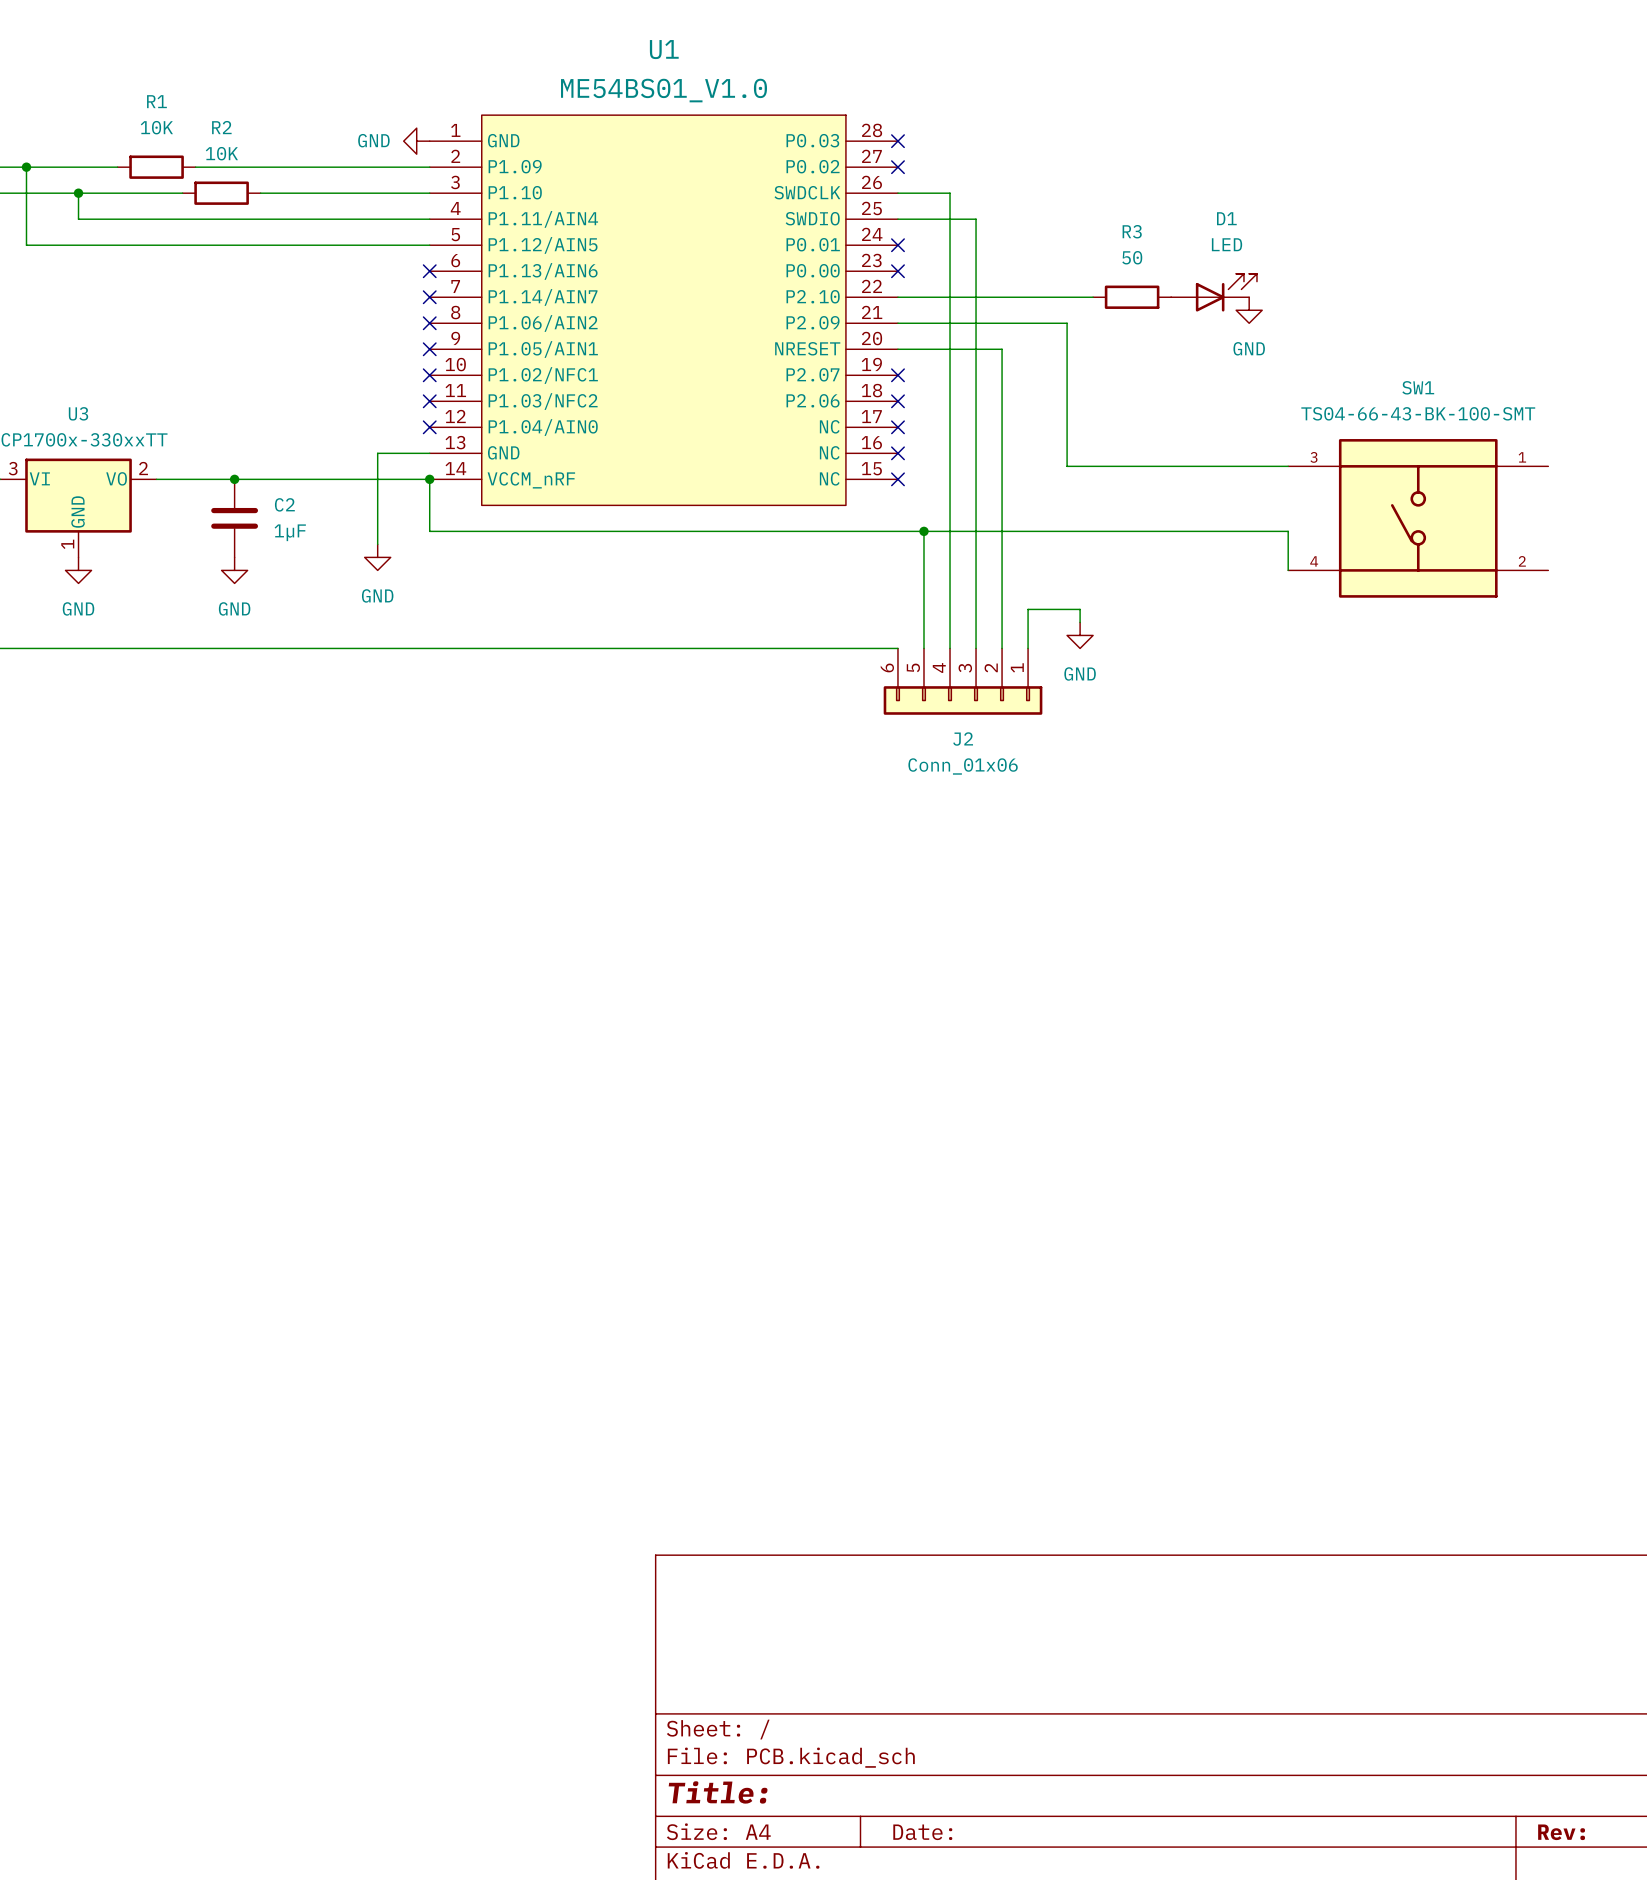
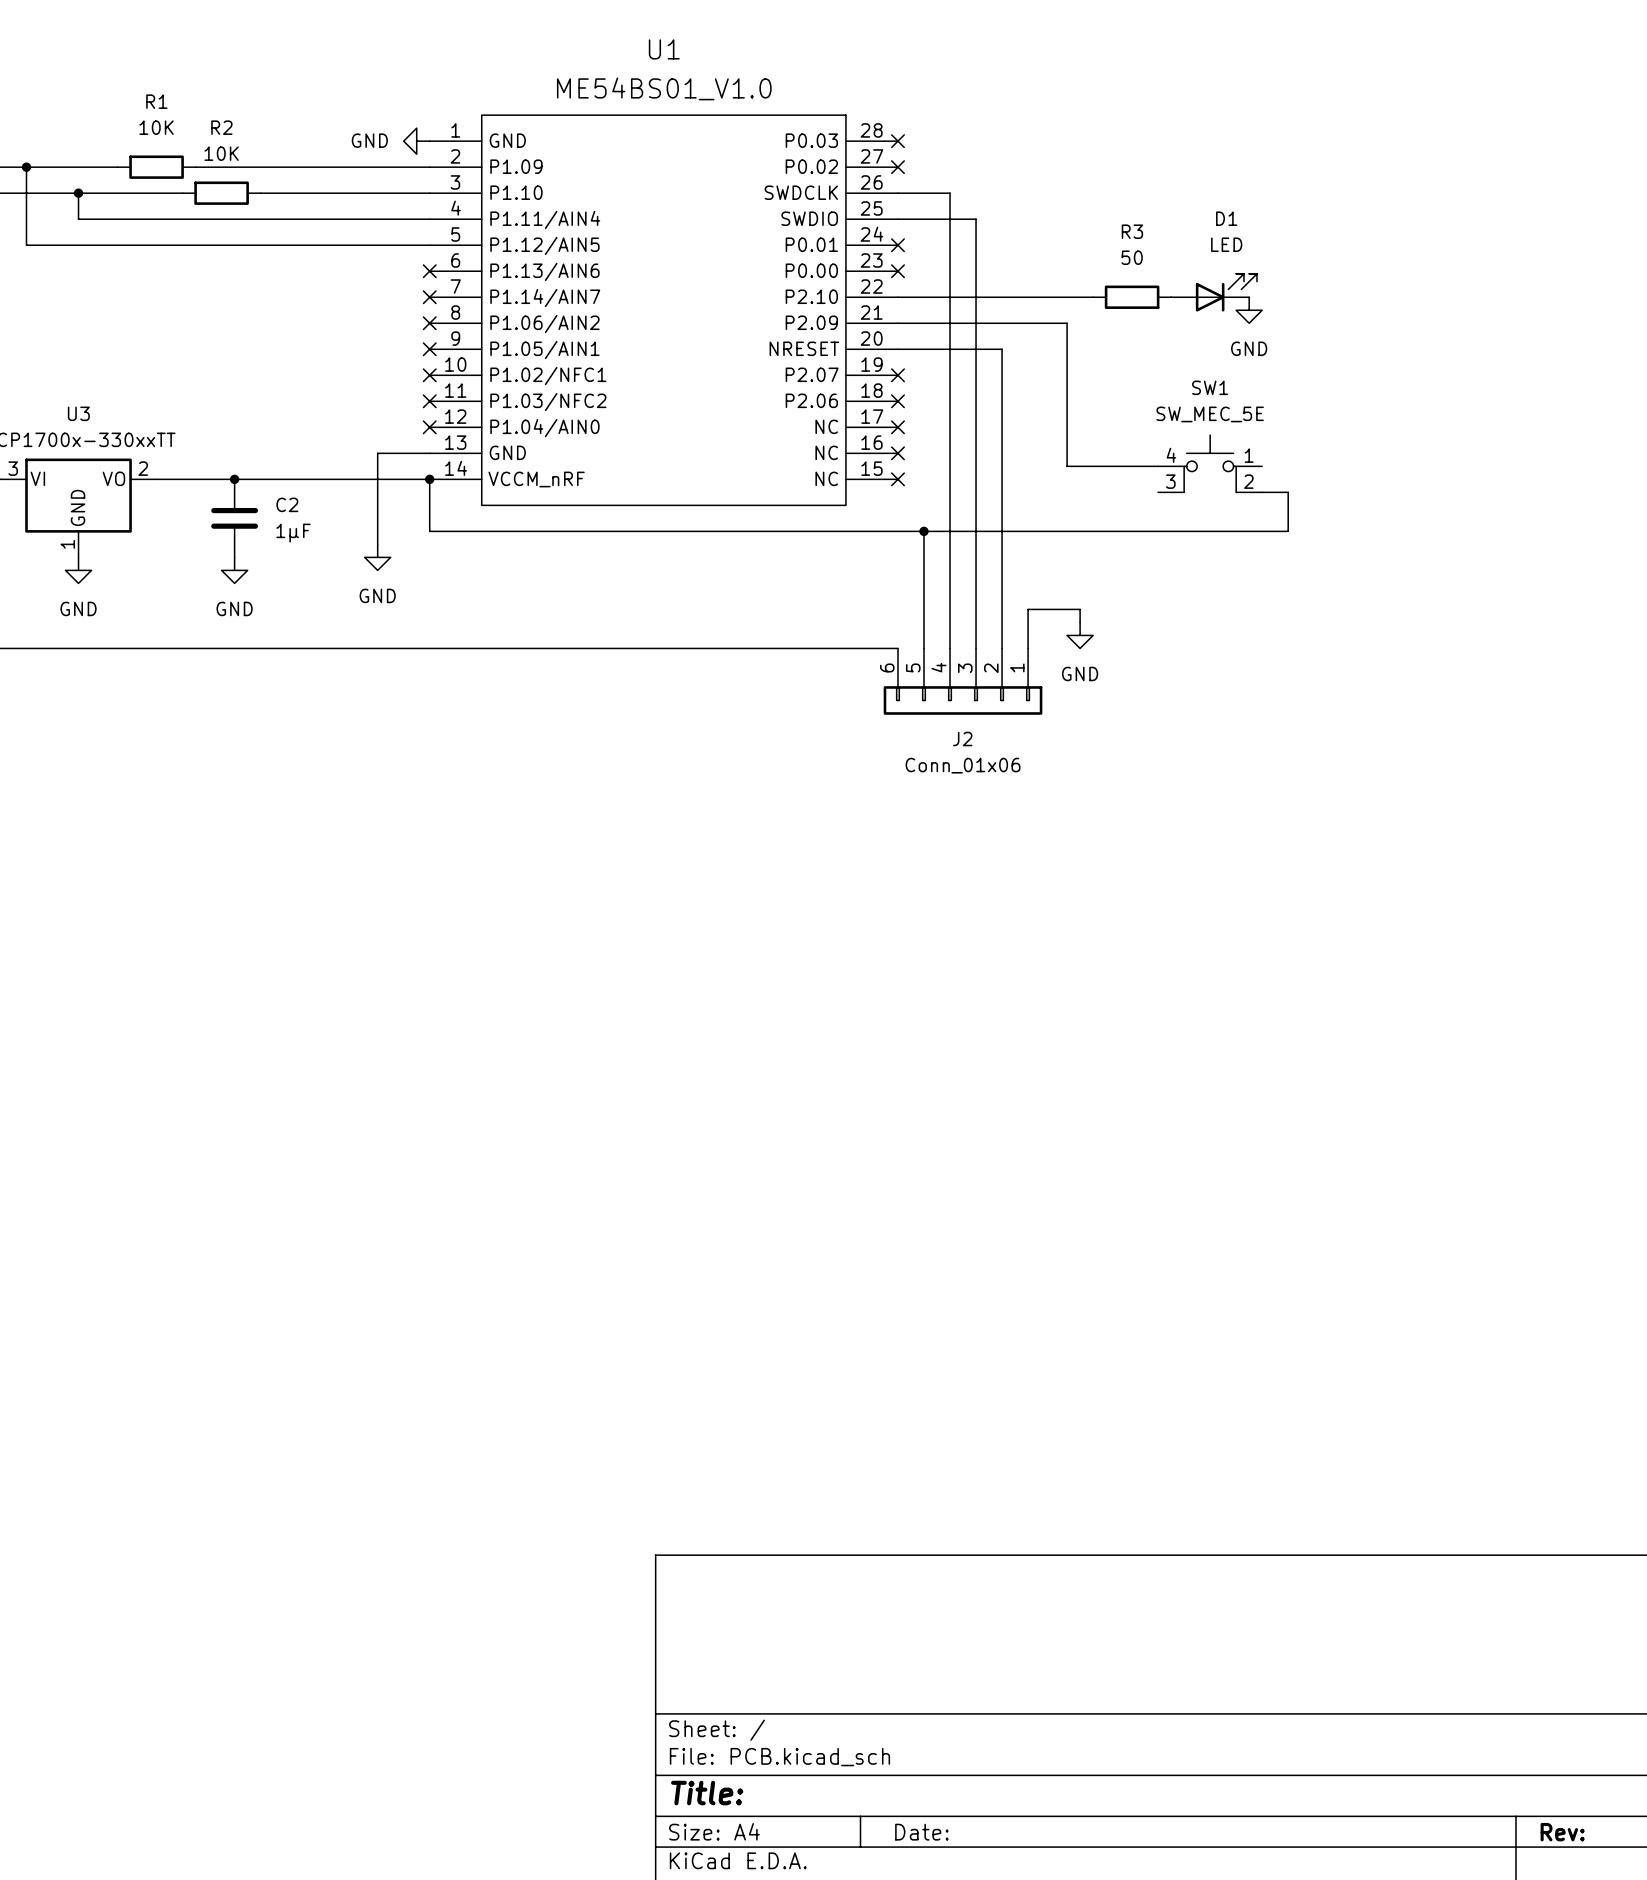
SW1 name position: SW1 (1418, 387) -> SW1 (1210, 387)
SW1 value: TS04-66-43-BK-100-SMT (1418, 413) -> SW_MEC_5E (1210, 414)
SW1 symbol: [1288, 439, 1549, 598] -> [1158, 435, 1263, 493]
wire: (1158, 466) (1288, 466) -> none
wire: (1288, 531) (1288, 570) -> (1288, 531) (1288, 492) (1262, 492)

